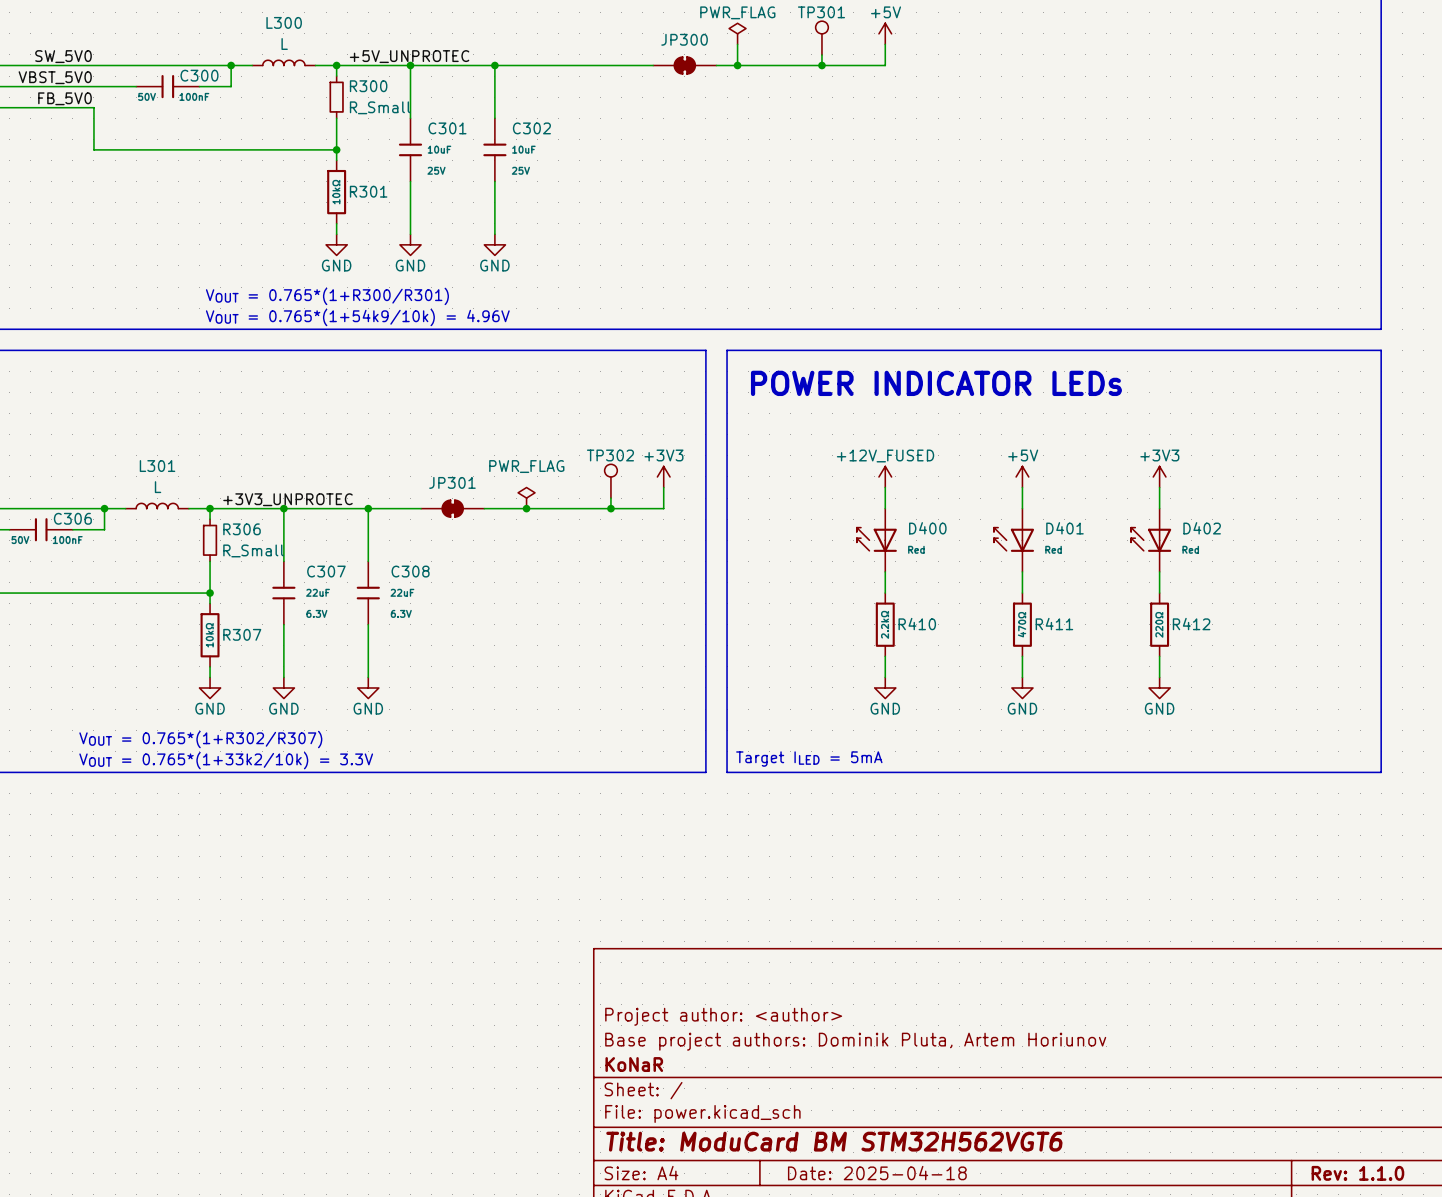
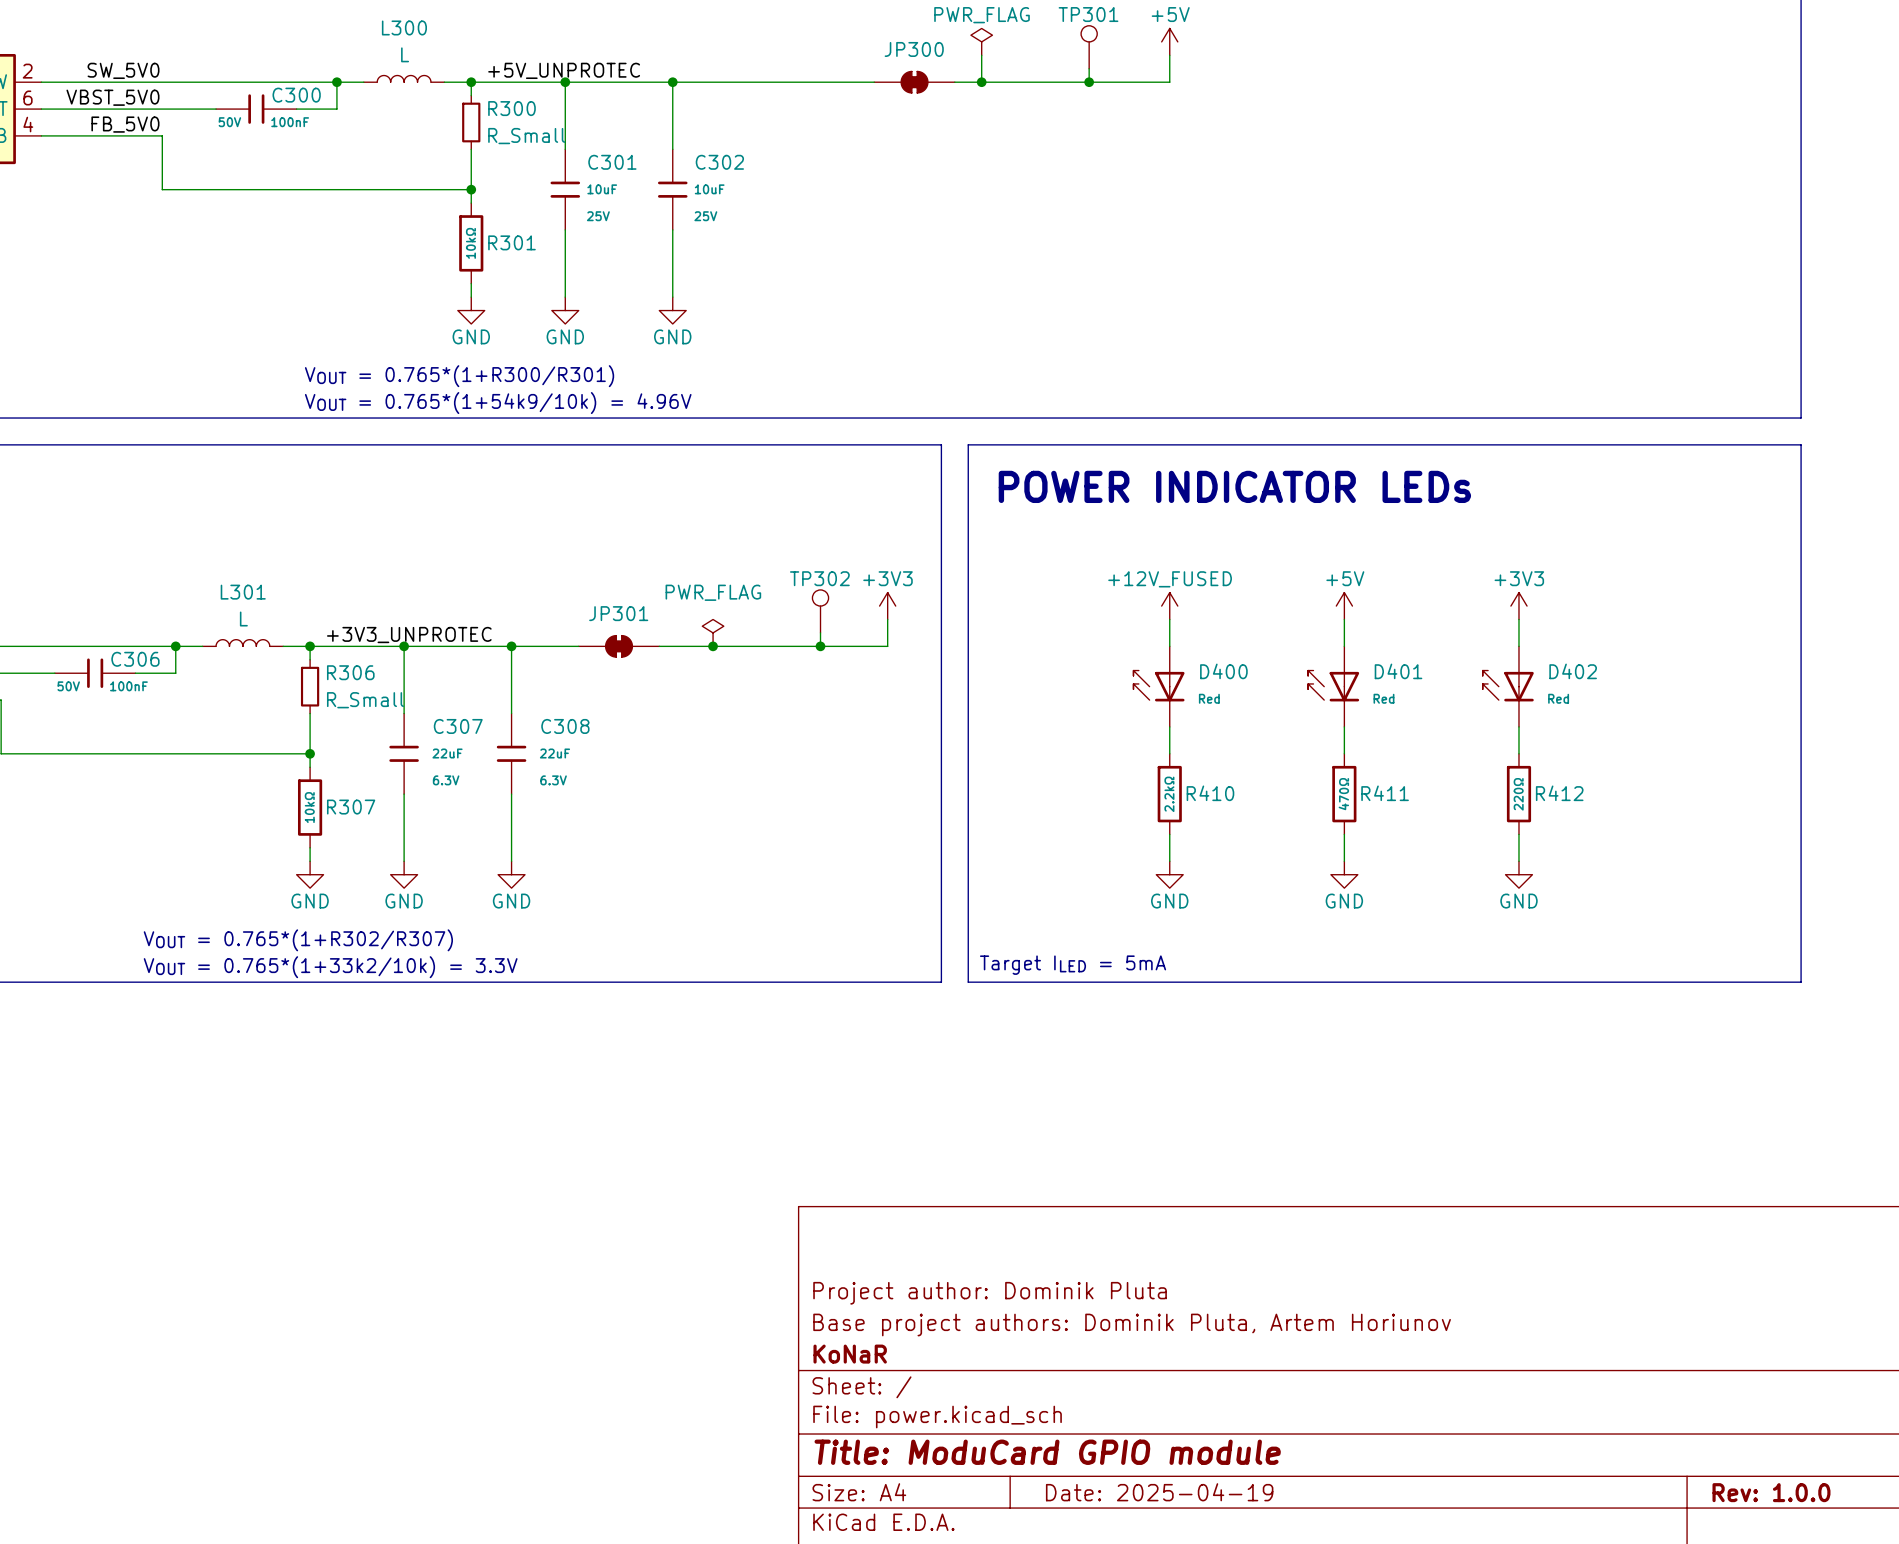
title block: Project author: <author> (723, 1016) -> Project author: Dominik Pluta (990, 1293)
title block: Title: ModuCard BM STM32H562VGT6 (834, 1141) -> Title: ModuCard GPIO module (1047, 1452)
title block: Date: 2025-04-18 (877, 1173) -> Date: 2025-04-19 (1159, 1492)
title block: Rev: 1.1.0 (1357, 1173) -> Rev: 1.0.0 (1771, 1492)

